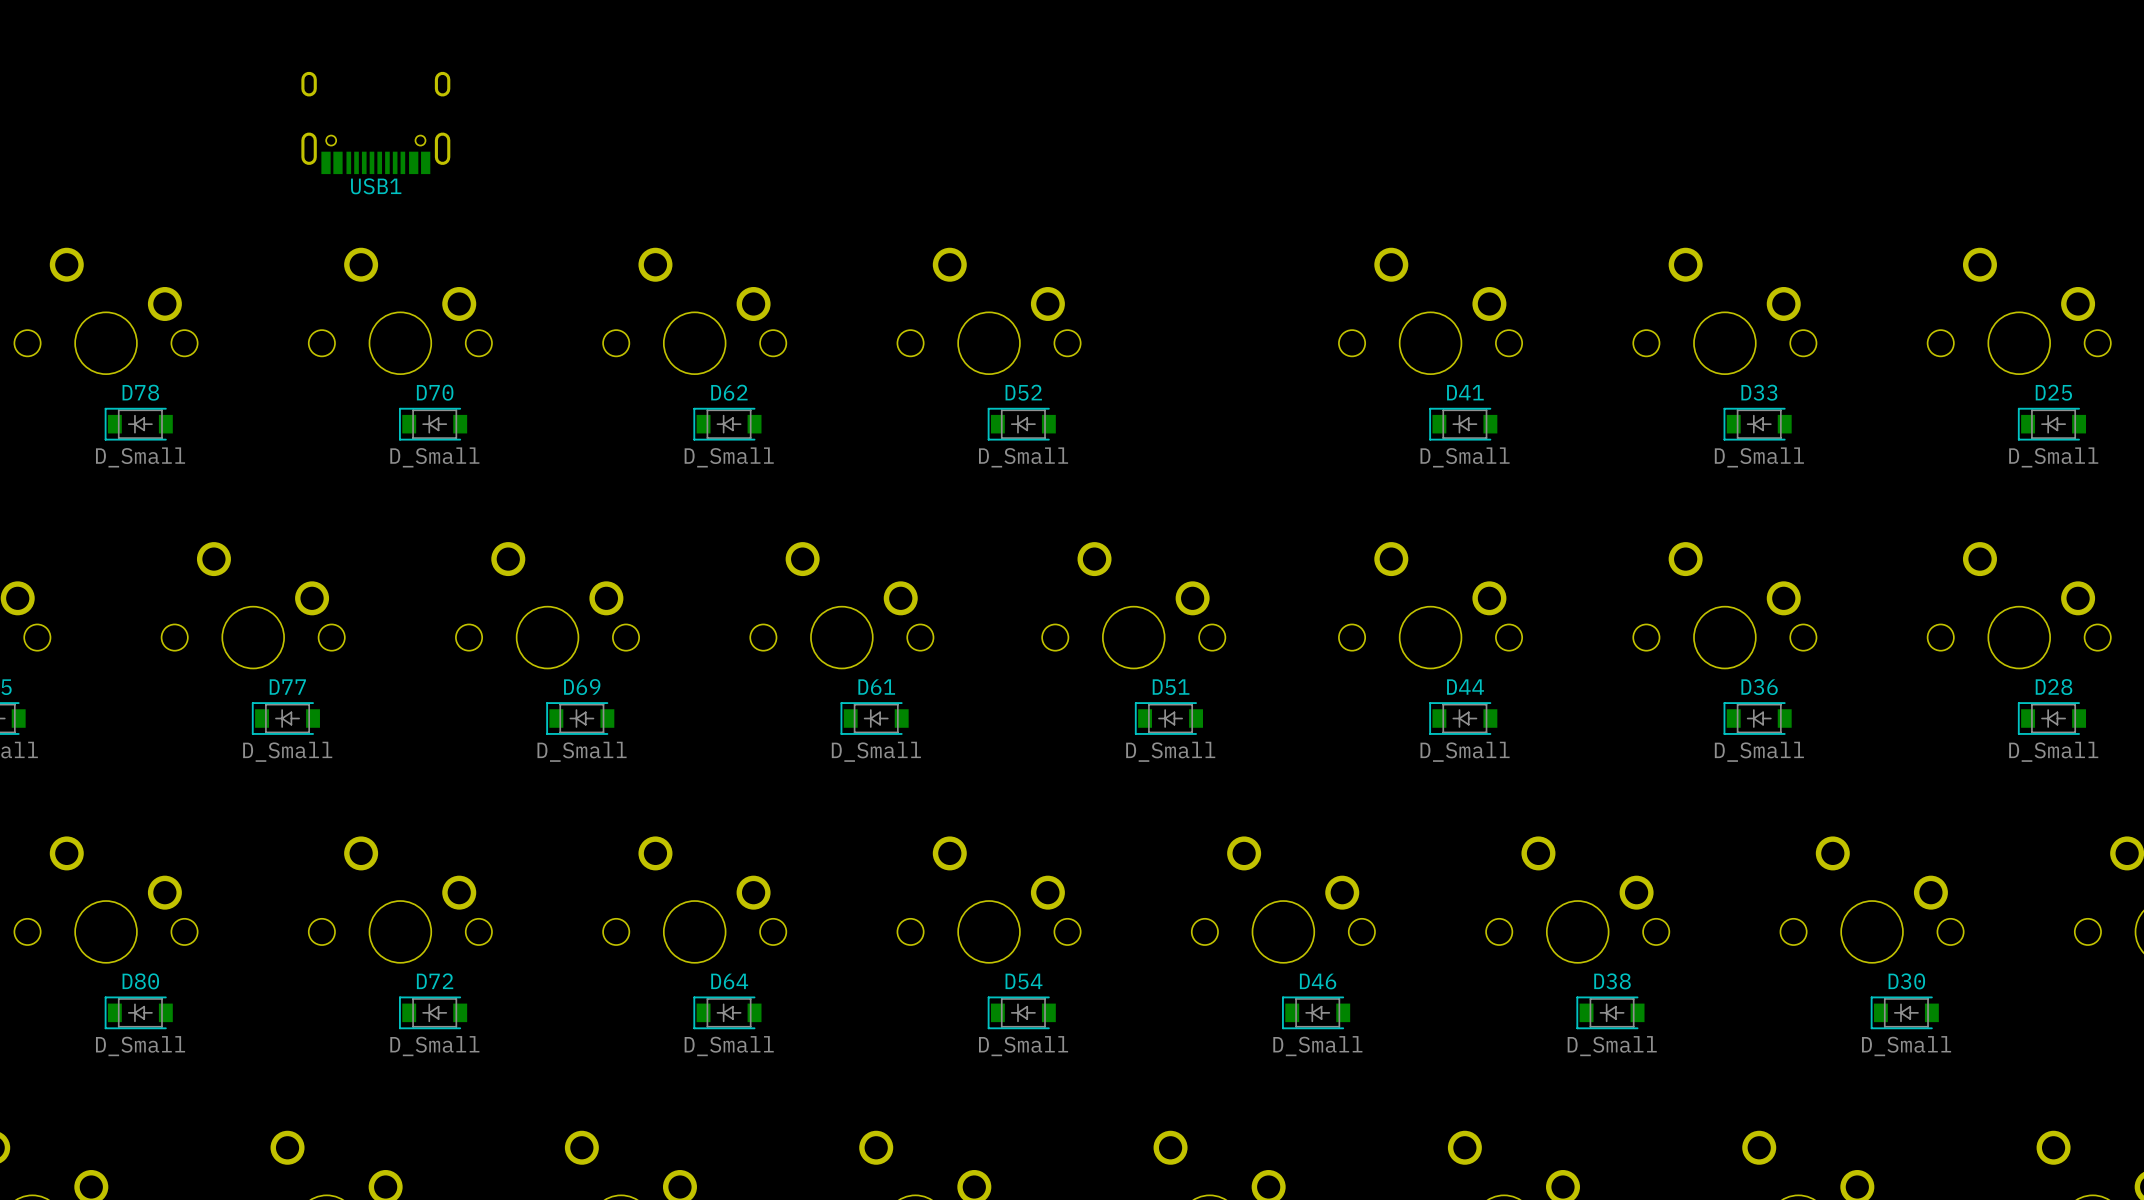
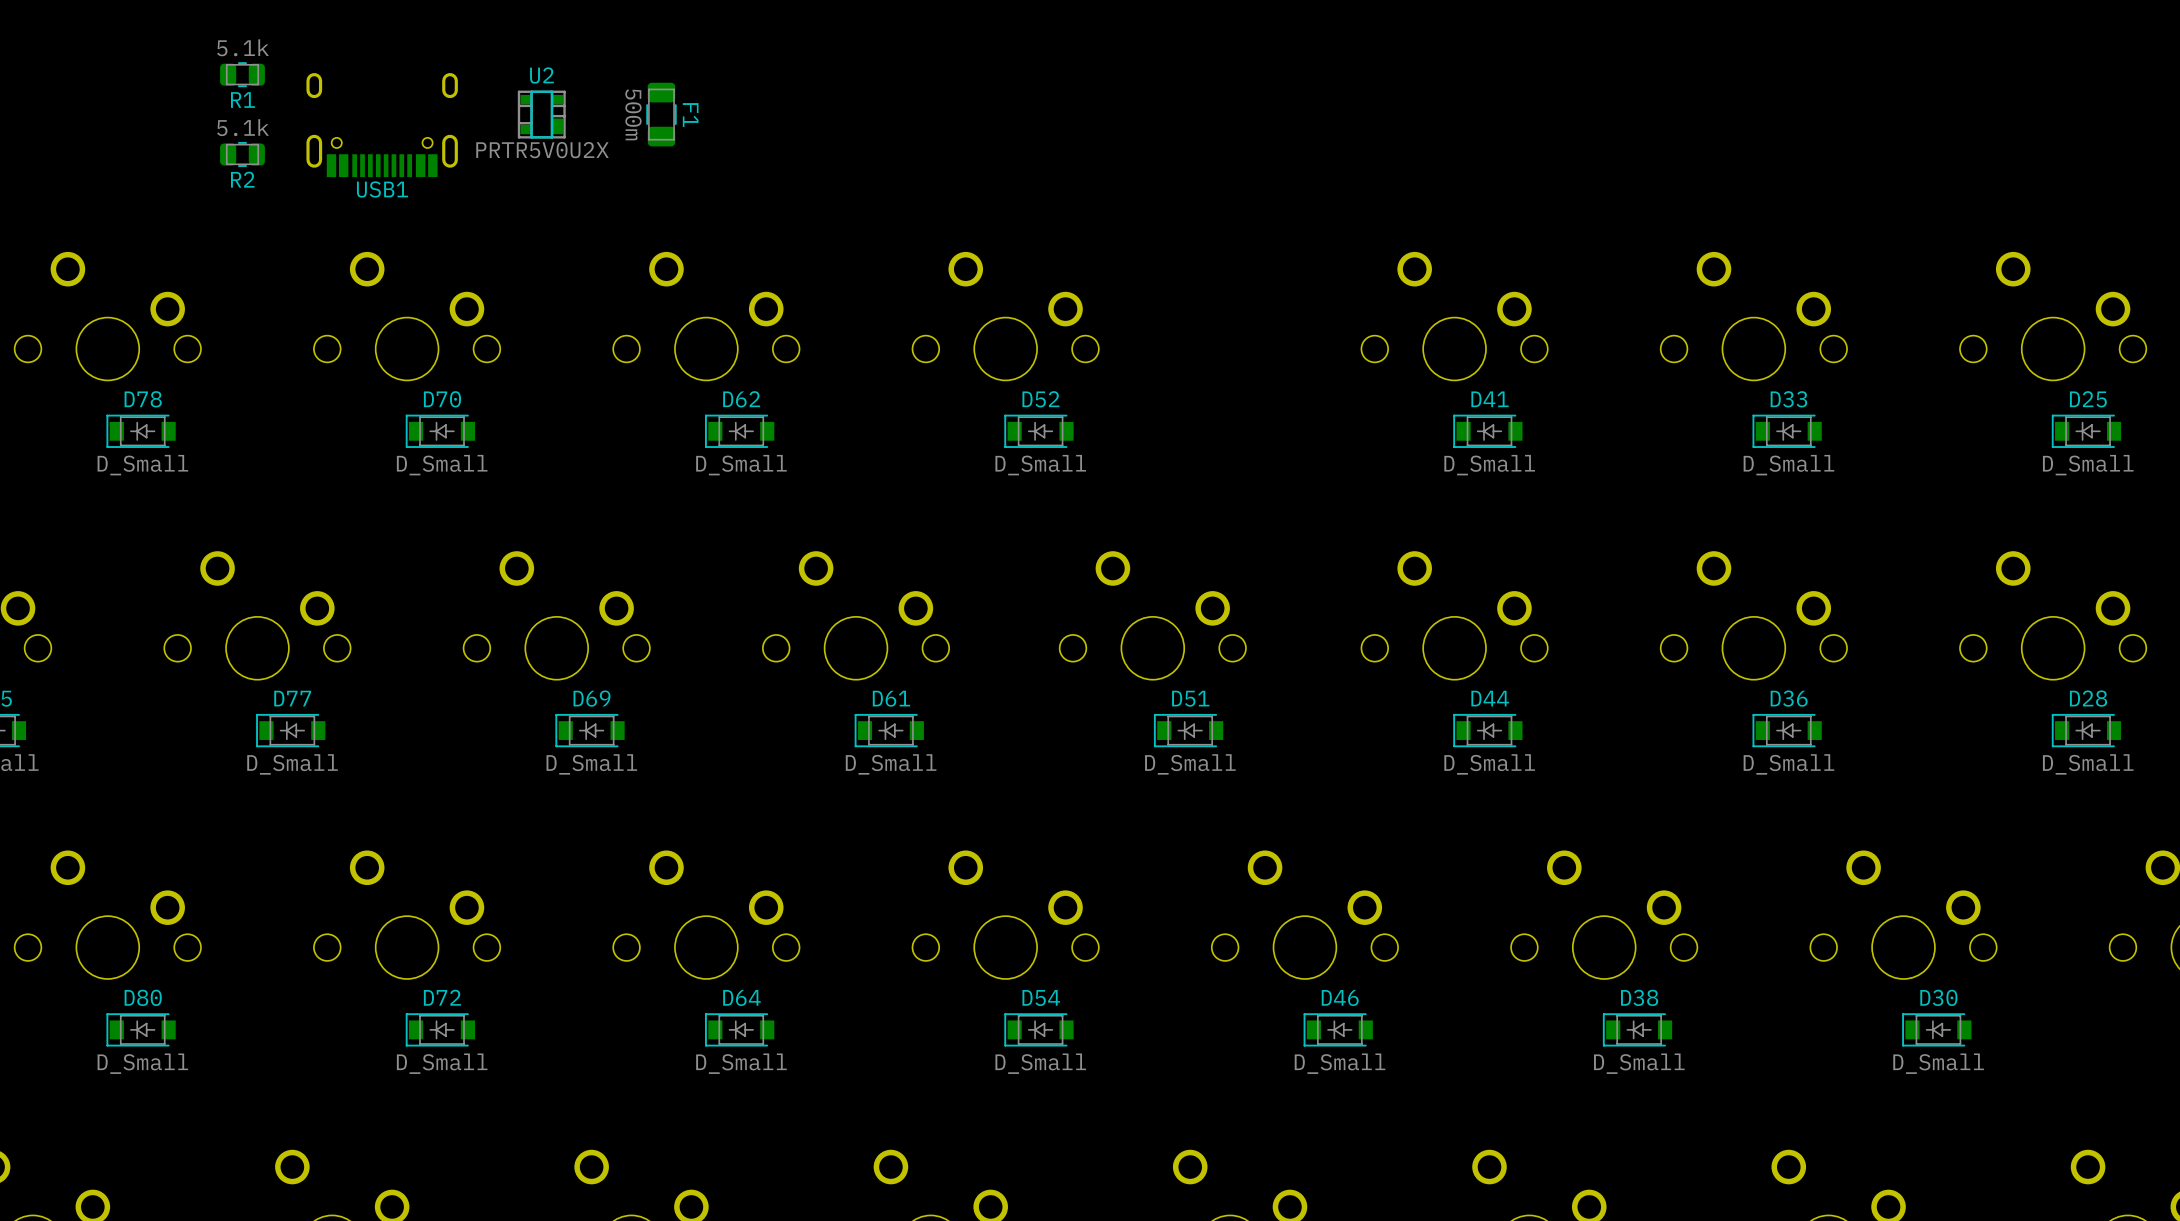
R1: none -> 5.1k (242, 74)
U2: none -> PRTR5V0U2X (541, 114)
F1: none -> 500m (661, 114)
R2: none -> 5.1k (242, 154)

